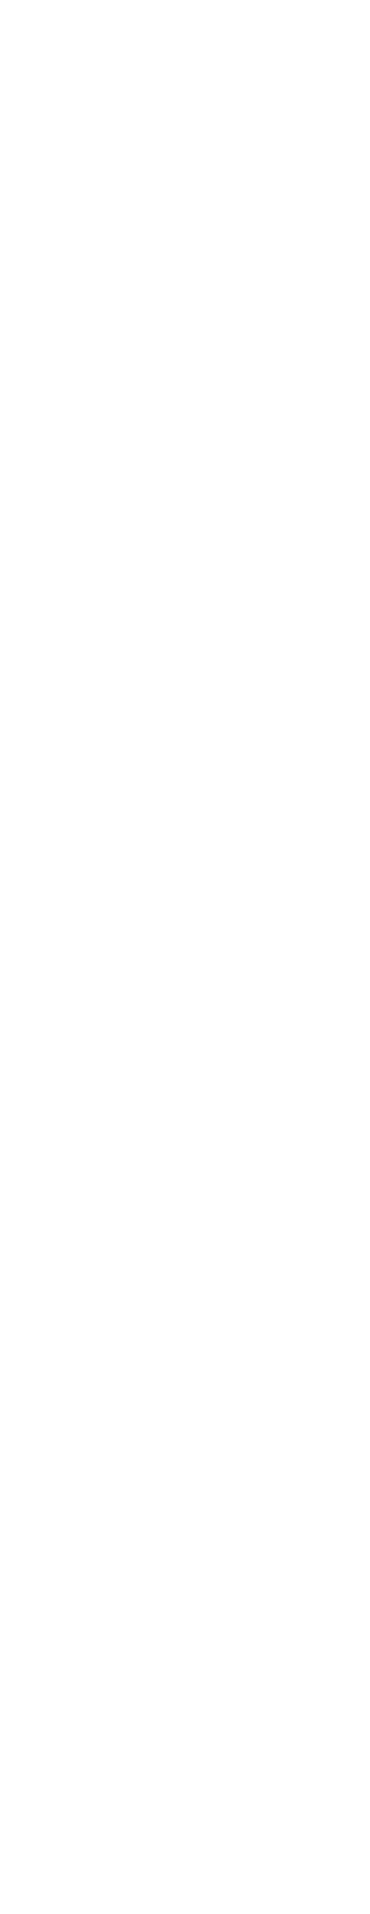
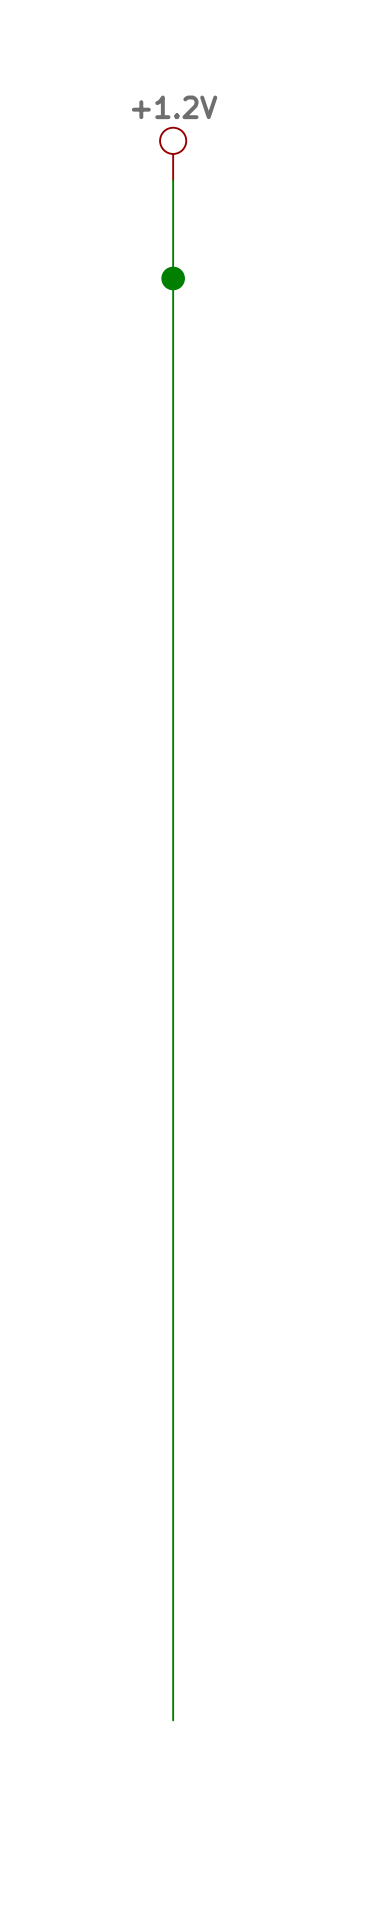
power symbol: none -> +1.2V (173, 153)
wire: none -> (173, 180) (173, 1720)
junction: none -> (173, 278)

